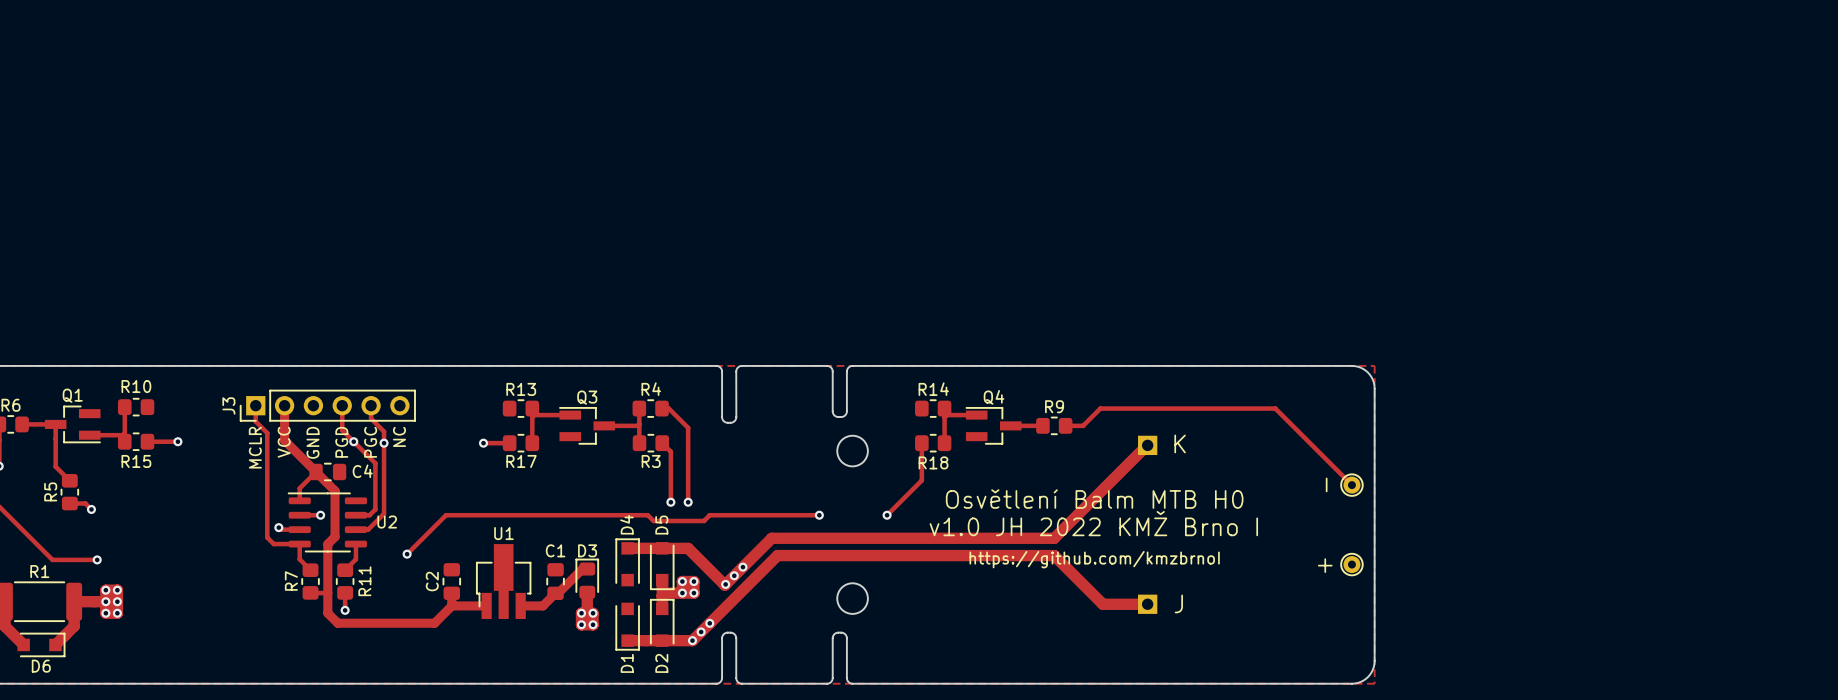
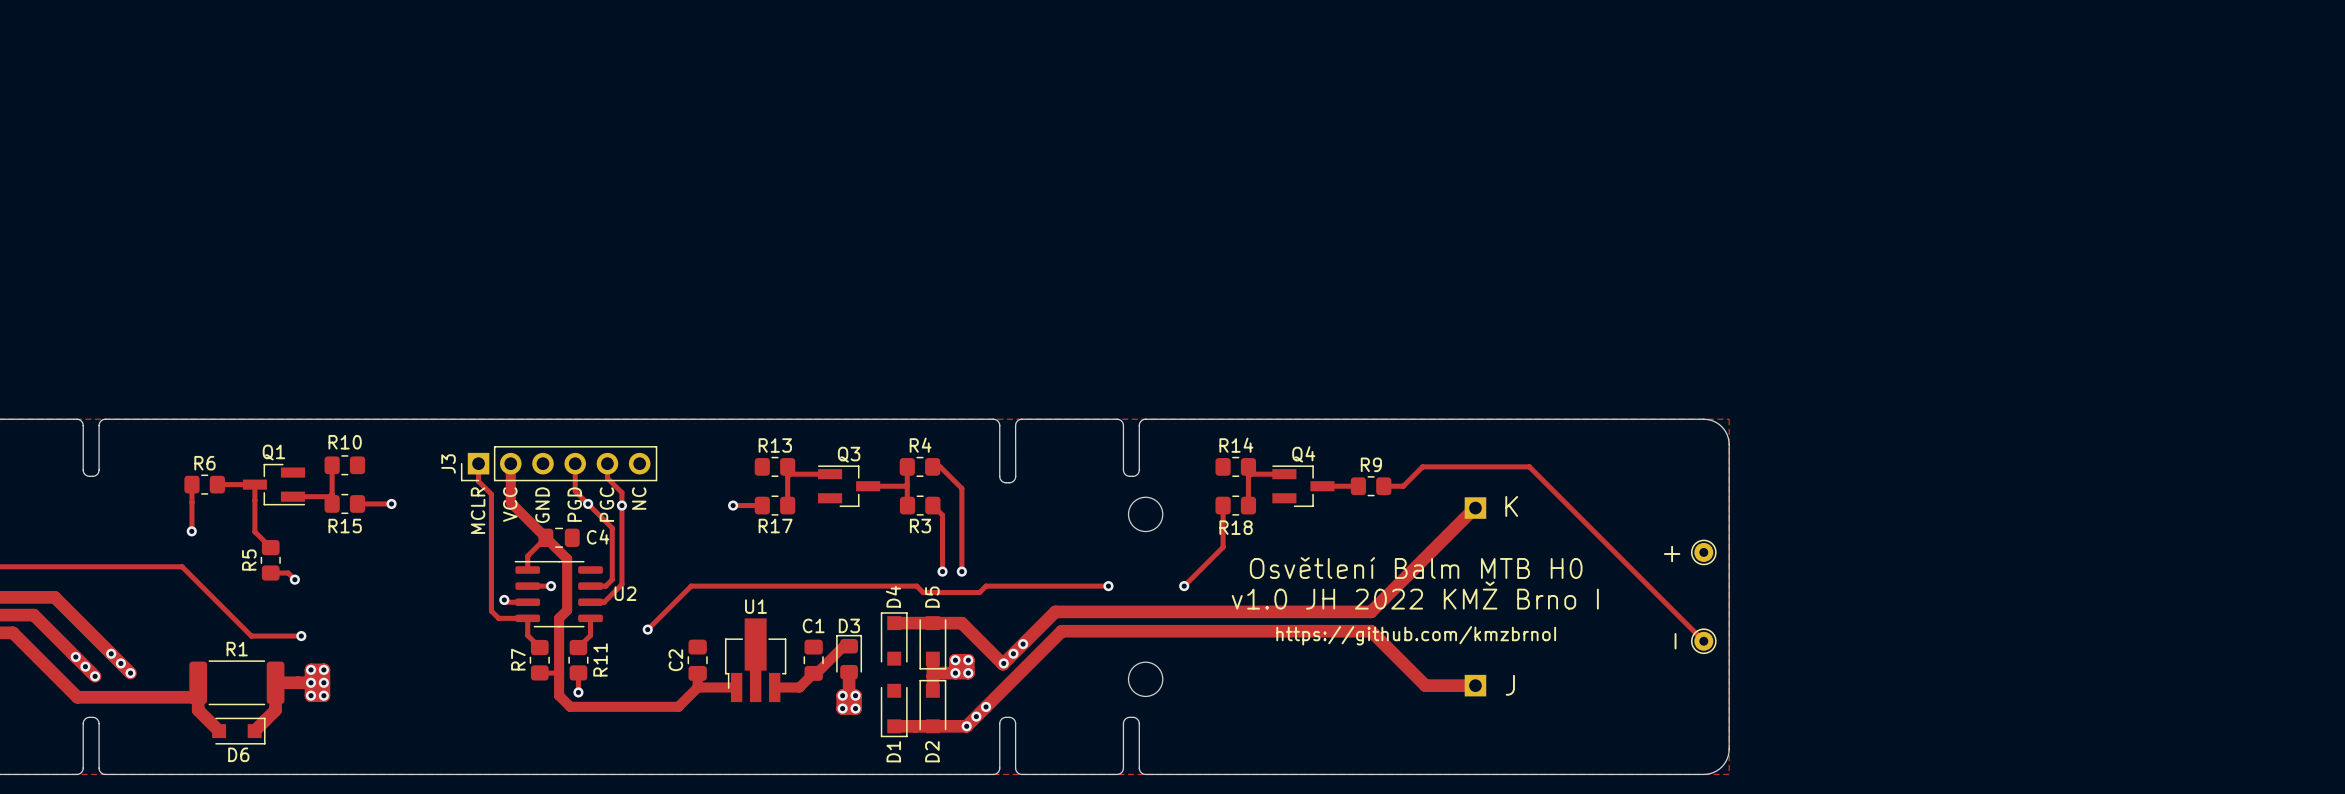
track: (1195, 408) (1275, 408) (1351, 485) -> (1529, 466) (1703, 641)
text: - (1326, 484) -> + (1672, 554)
text: + (1325, 565) -> - (1675, 641)

